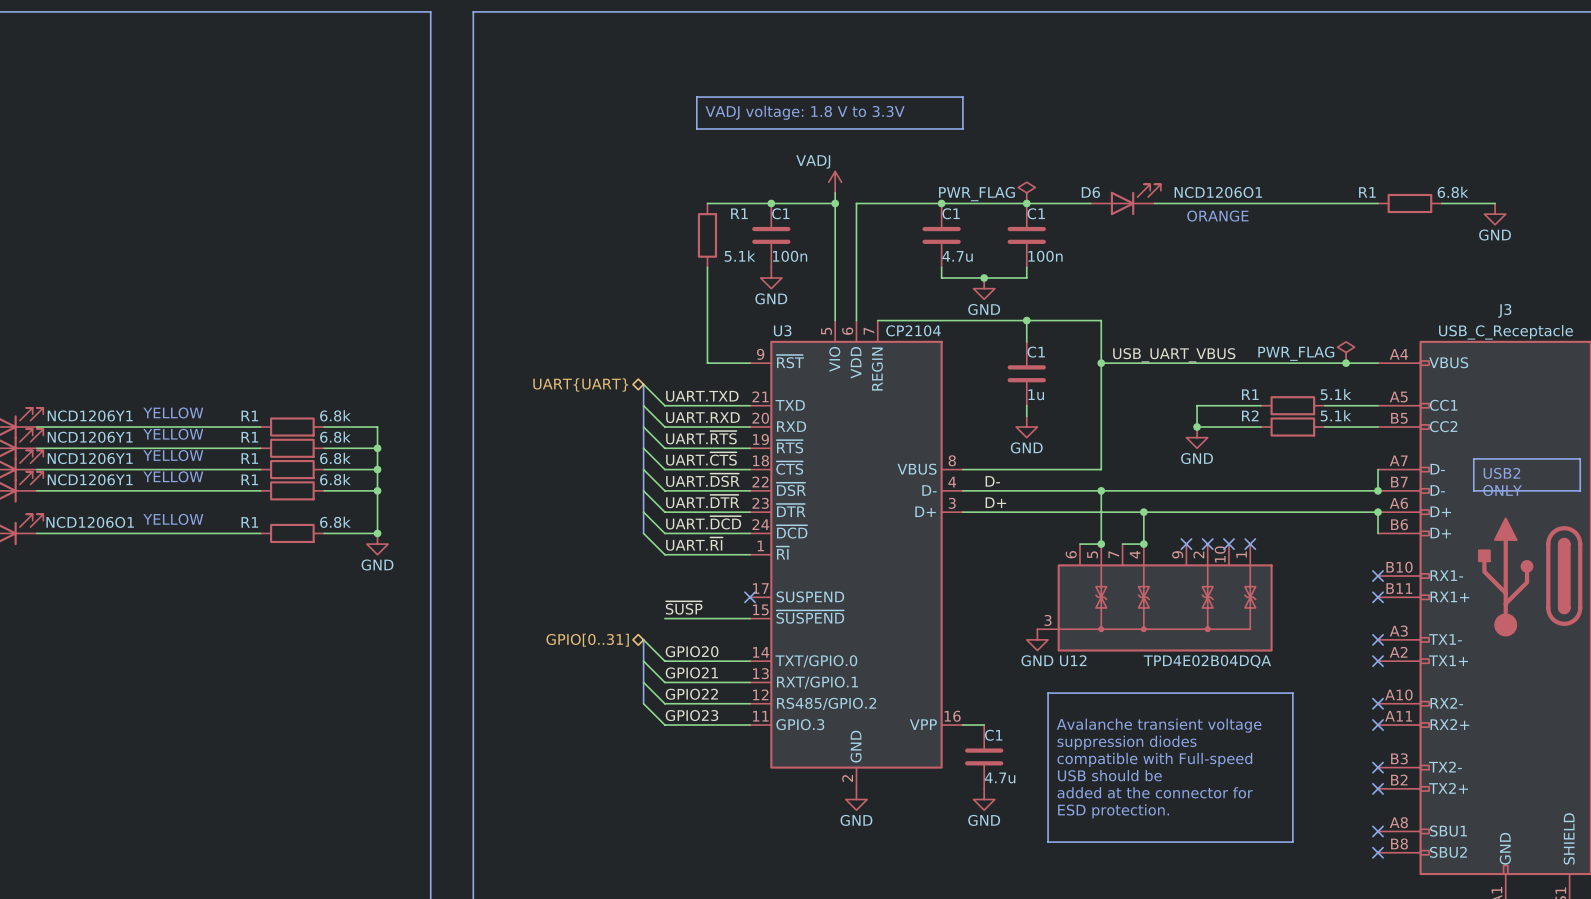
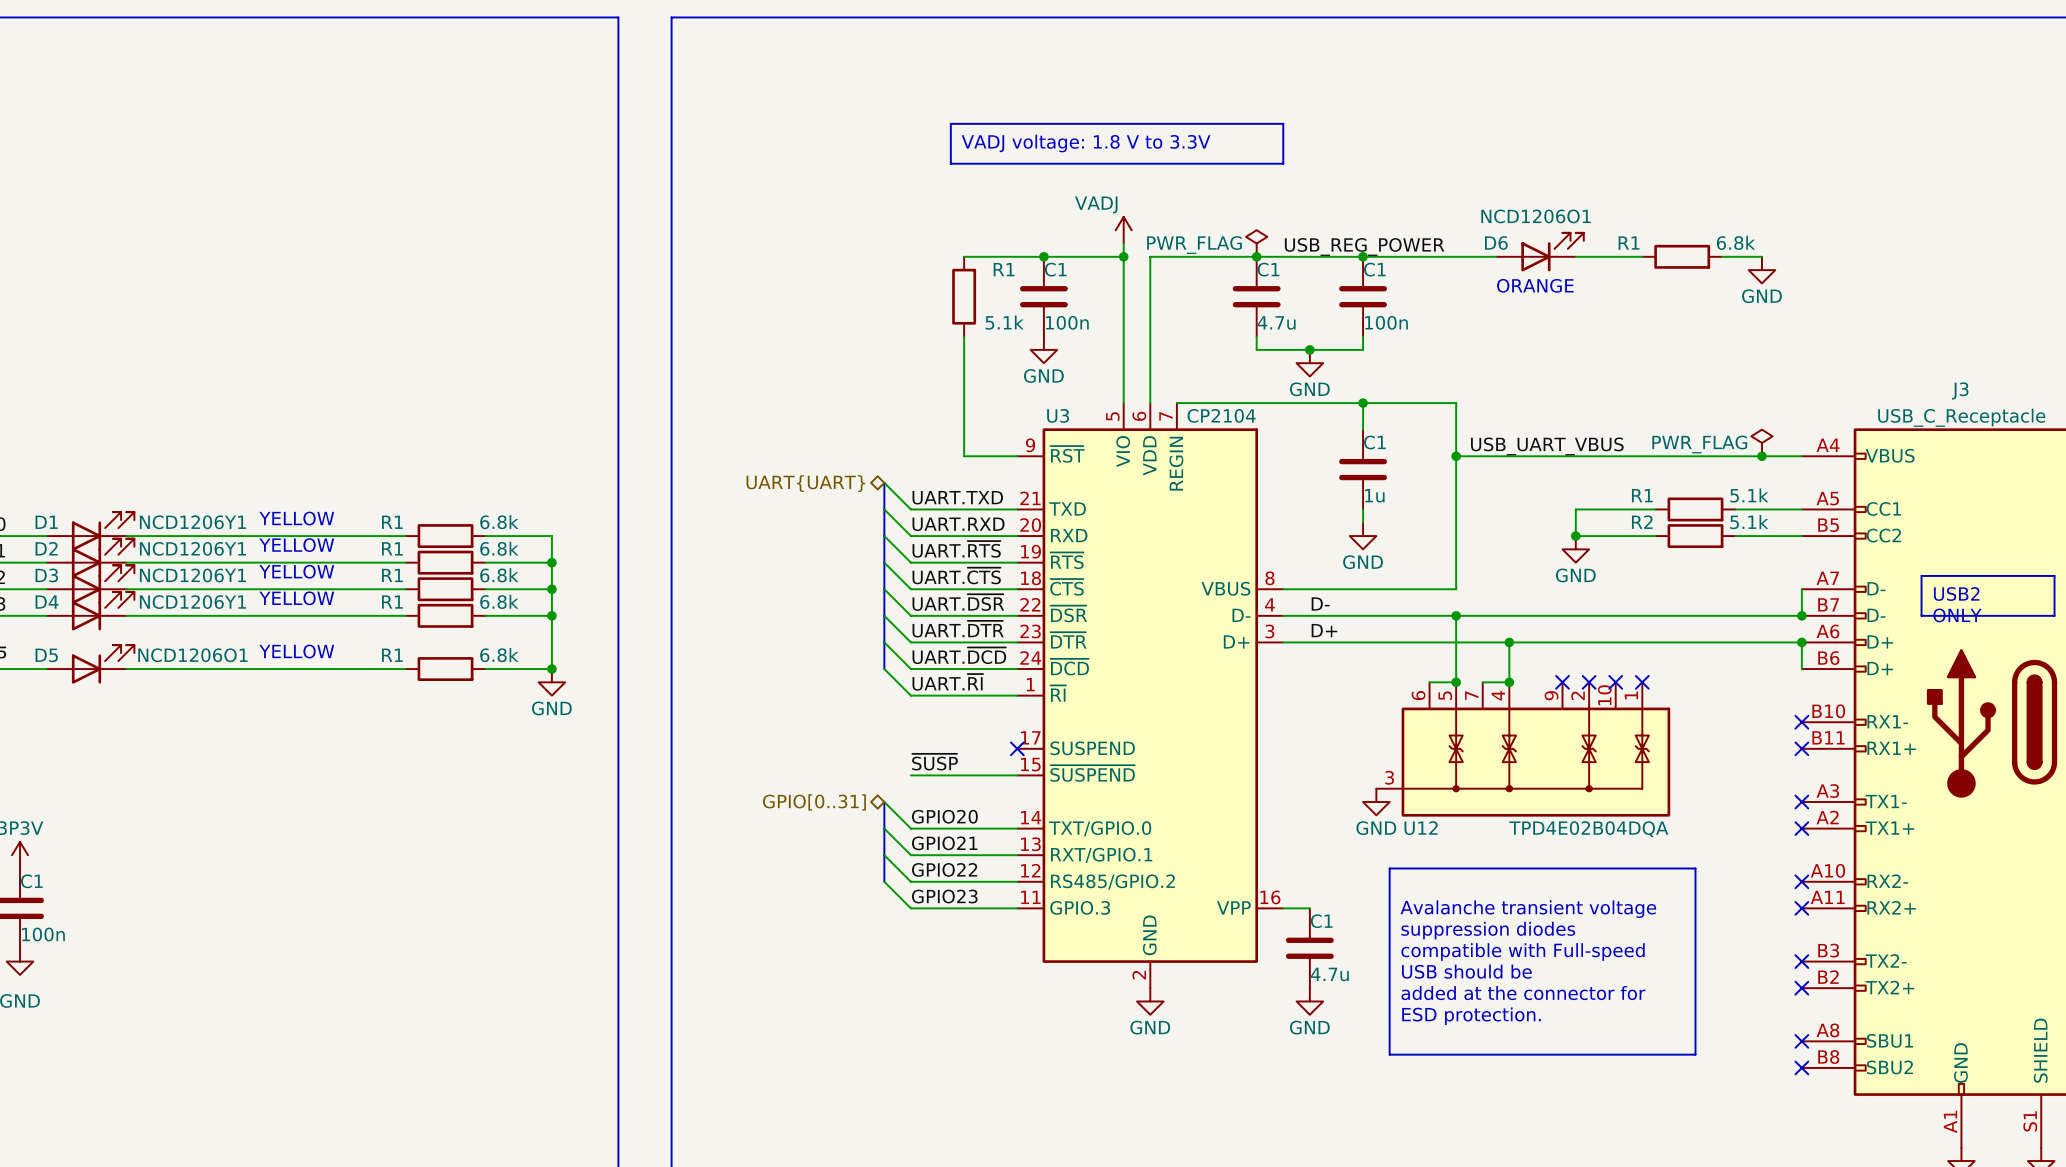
power symbol position: PWR_FLAG (1026, 192) -> PWR_FLAG (1256, 243)
D6 value position: NCD1206O1 (1218, 192) -> NCD1206O1 (1535, 216)
label: none -> USB_REG_POWER (1364, 246)
D6 position: (1125, 199) -> (1539, 252)
wire: (1250, 203) (1314, 203) -> none
wire: (1346, 203) (1378, 203) -> none
R1 position: (1409, 203) -> (1682, 256)
wire: (1441, 203) (1495, 203) -> none
power symbol position: GND (1495, 214) -> GND (1761, 270)
text position: ORANGE (1217, 216) -> ORANGE (1535, 285)

